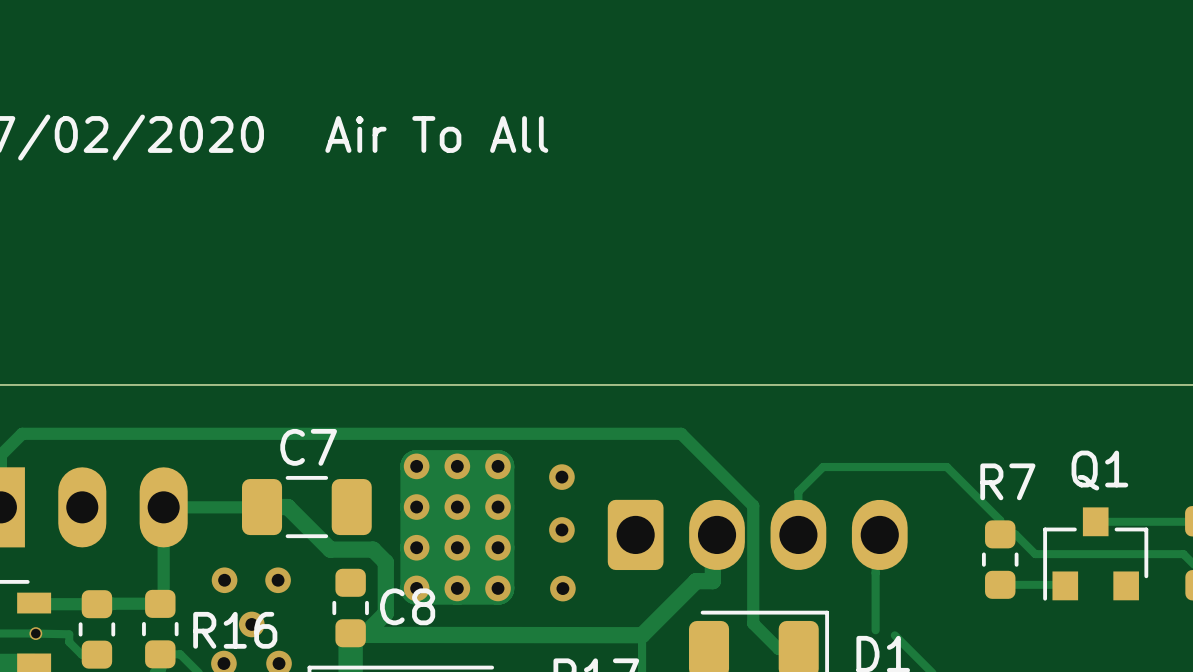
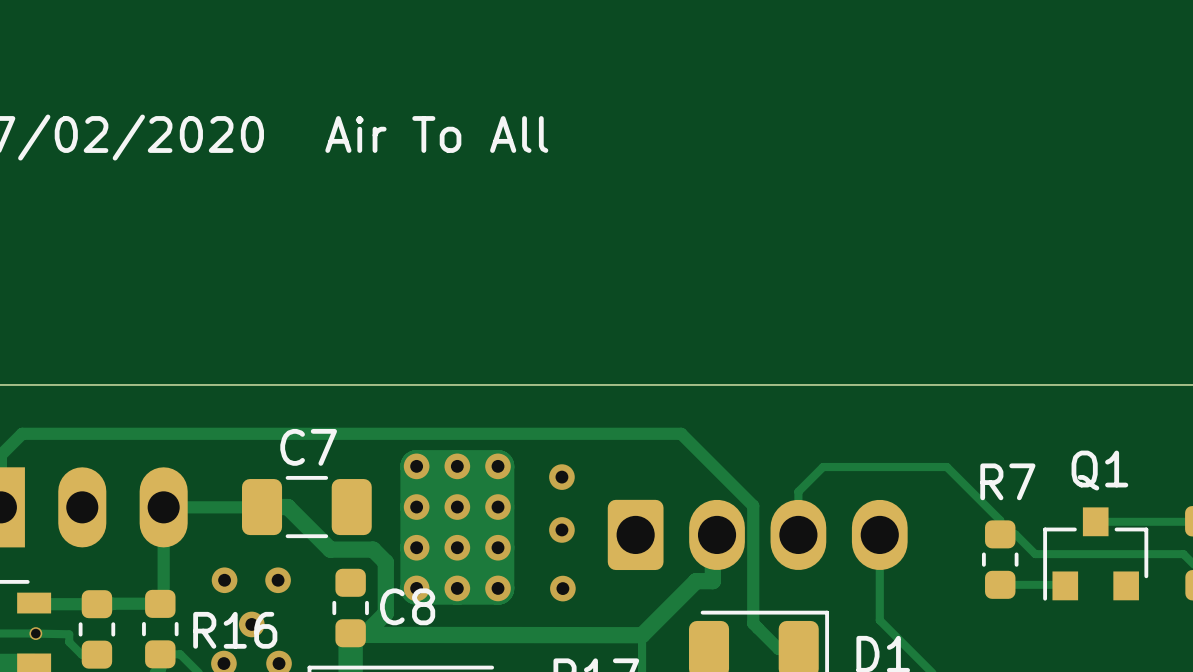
track: (875, 529) (875, 630) -> none
track: none -> (879, 534) (879, 620) (894, 635)

